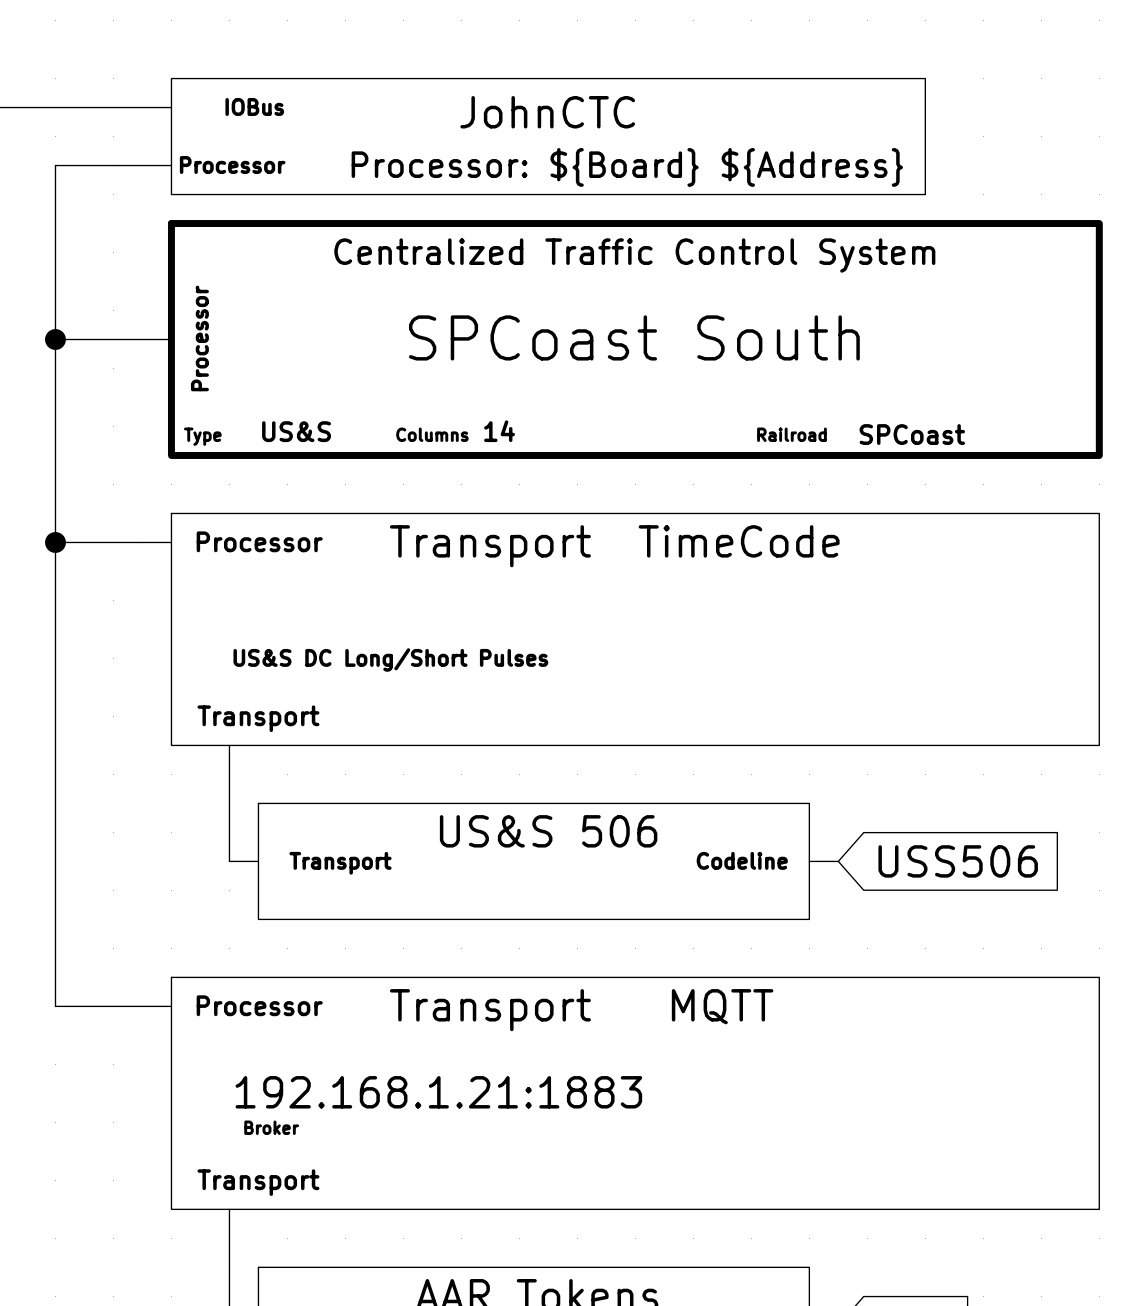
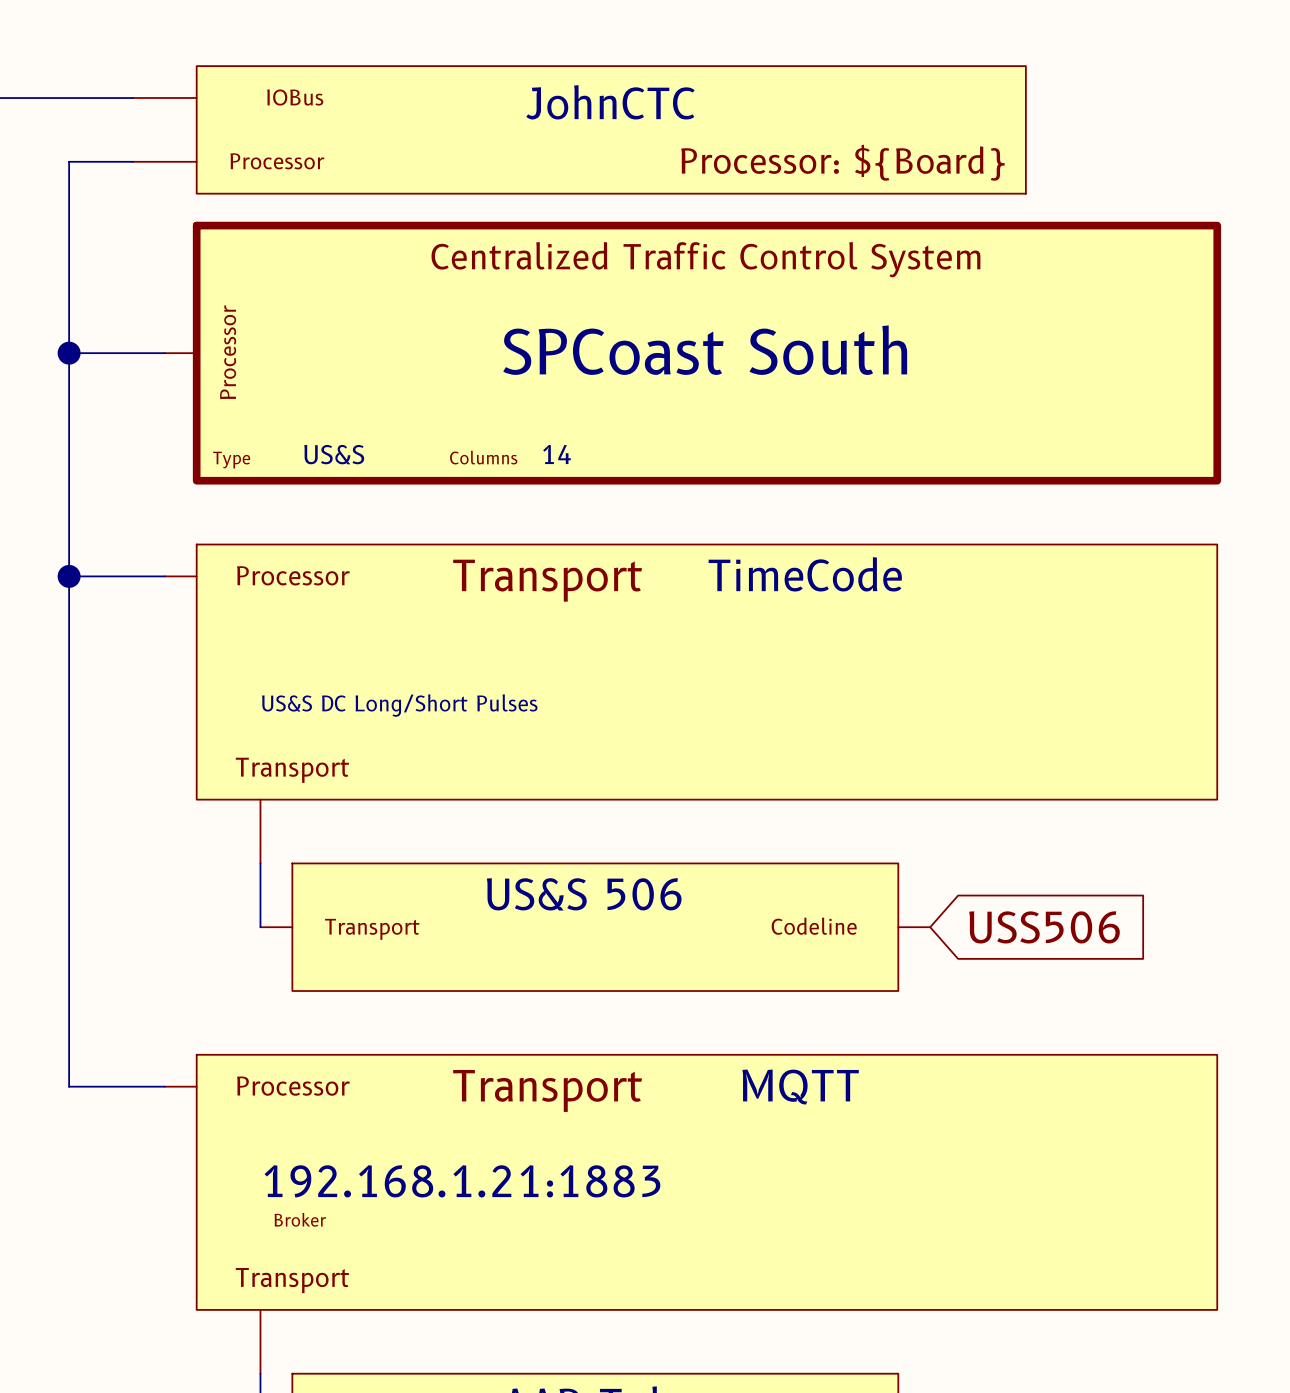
part text: Processor: ${Board} ${Address} (627, 167) -> Processor: ${Board} (842, 162)
part text: Railroad (791, 434) -> none
part text: SPCoast (912, 434) -> none

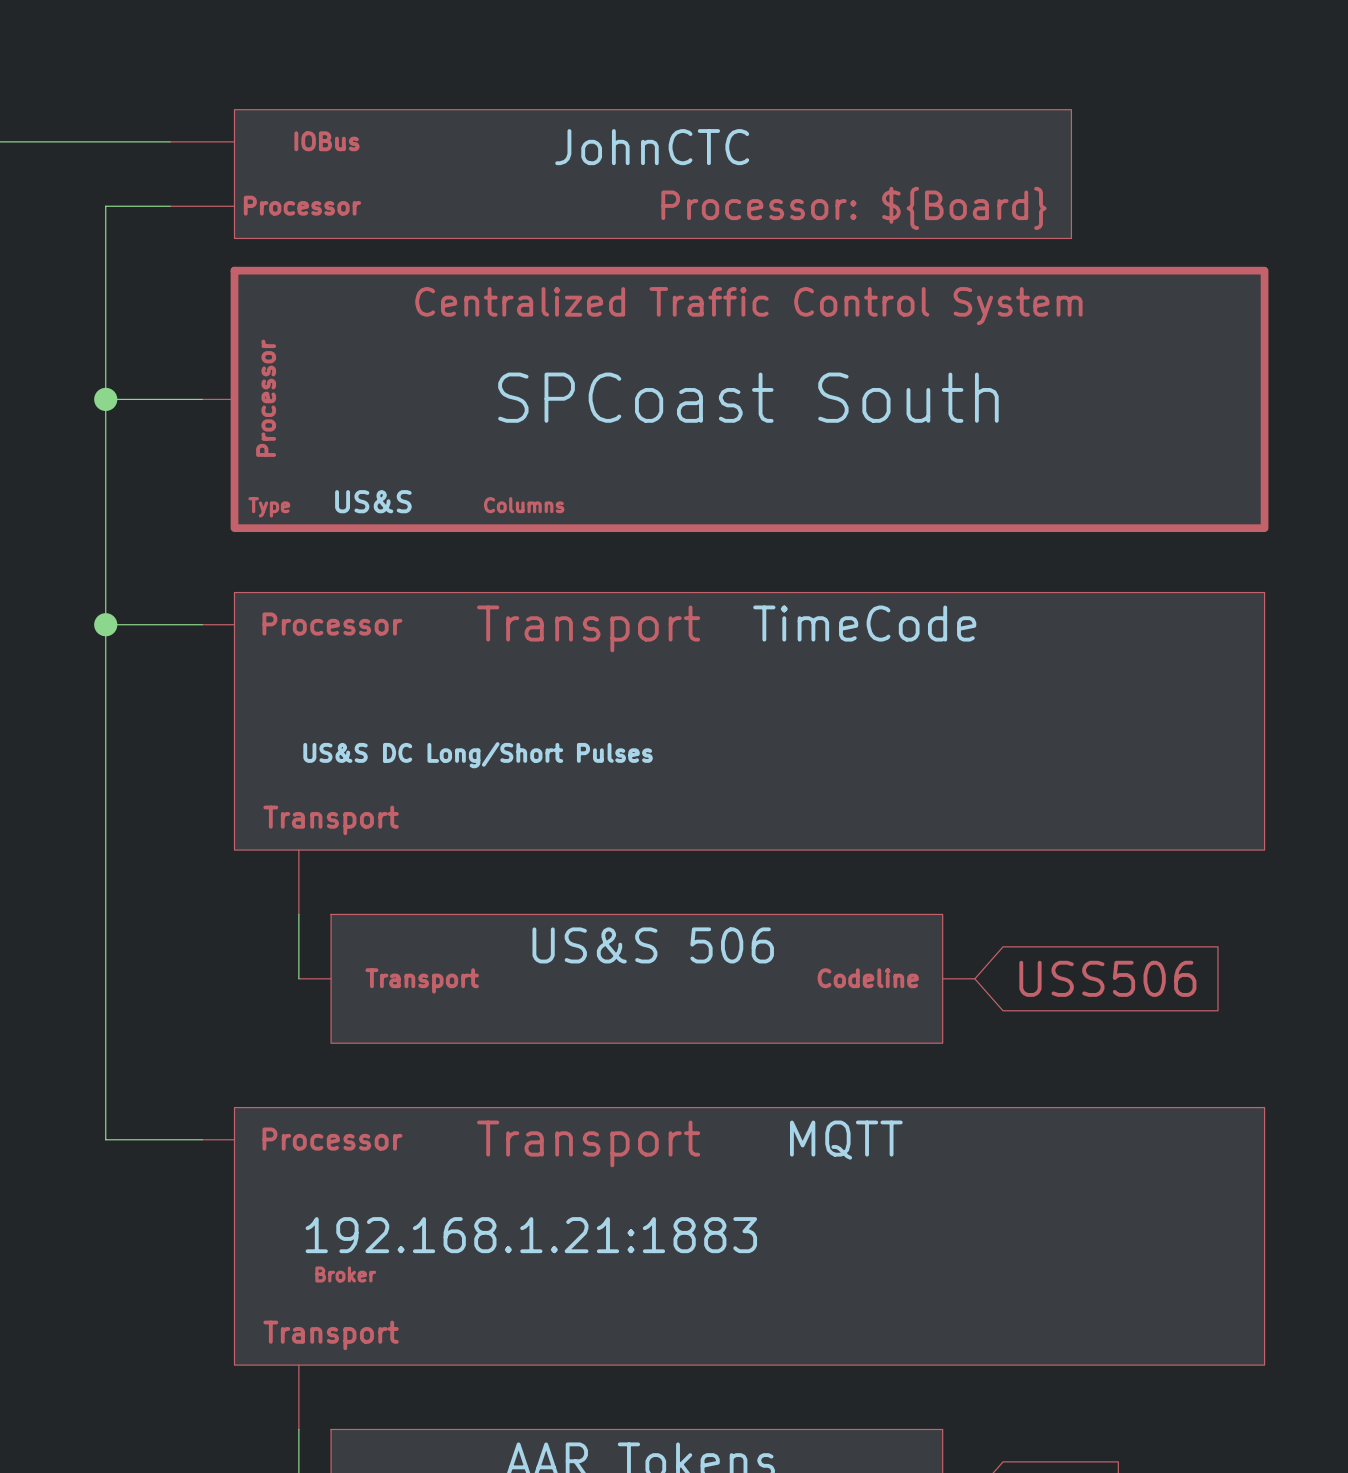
part text: 14 (557, 454) -> none

